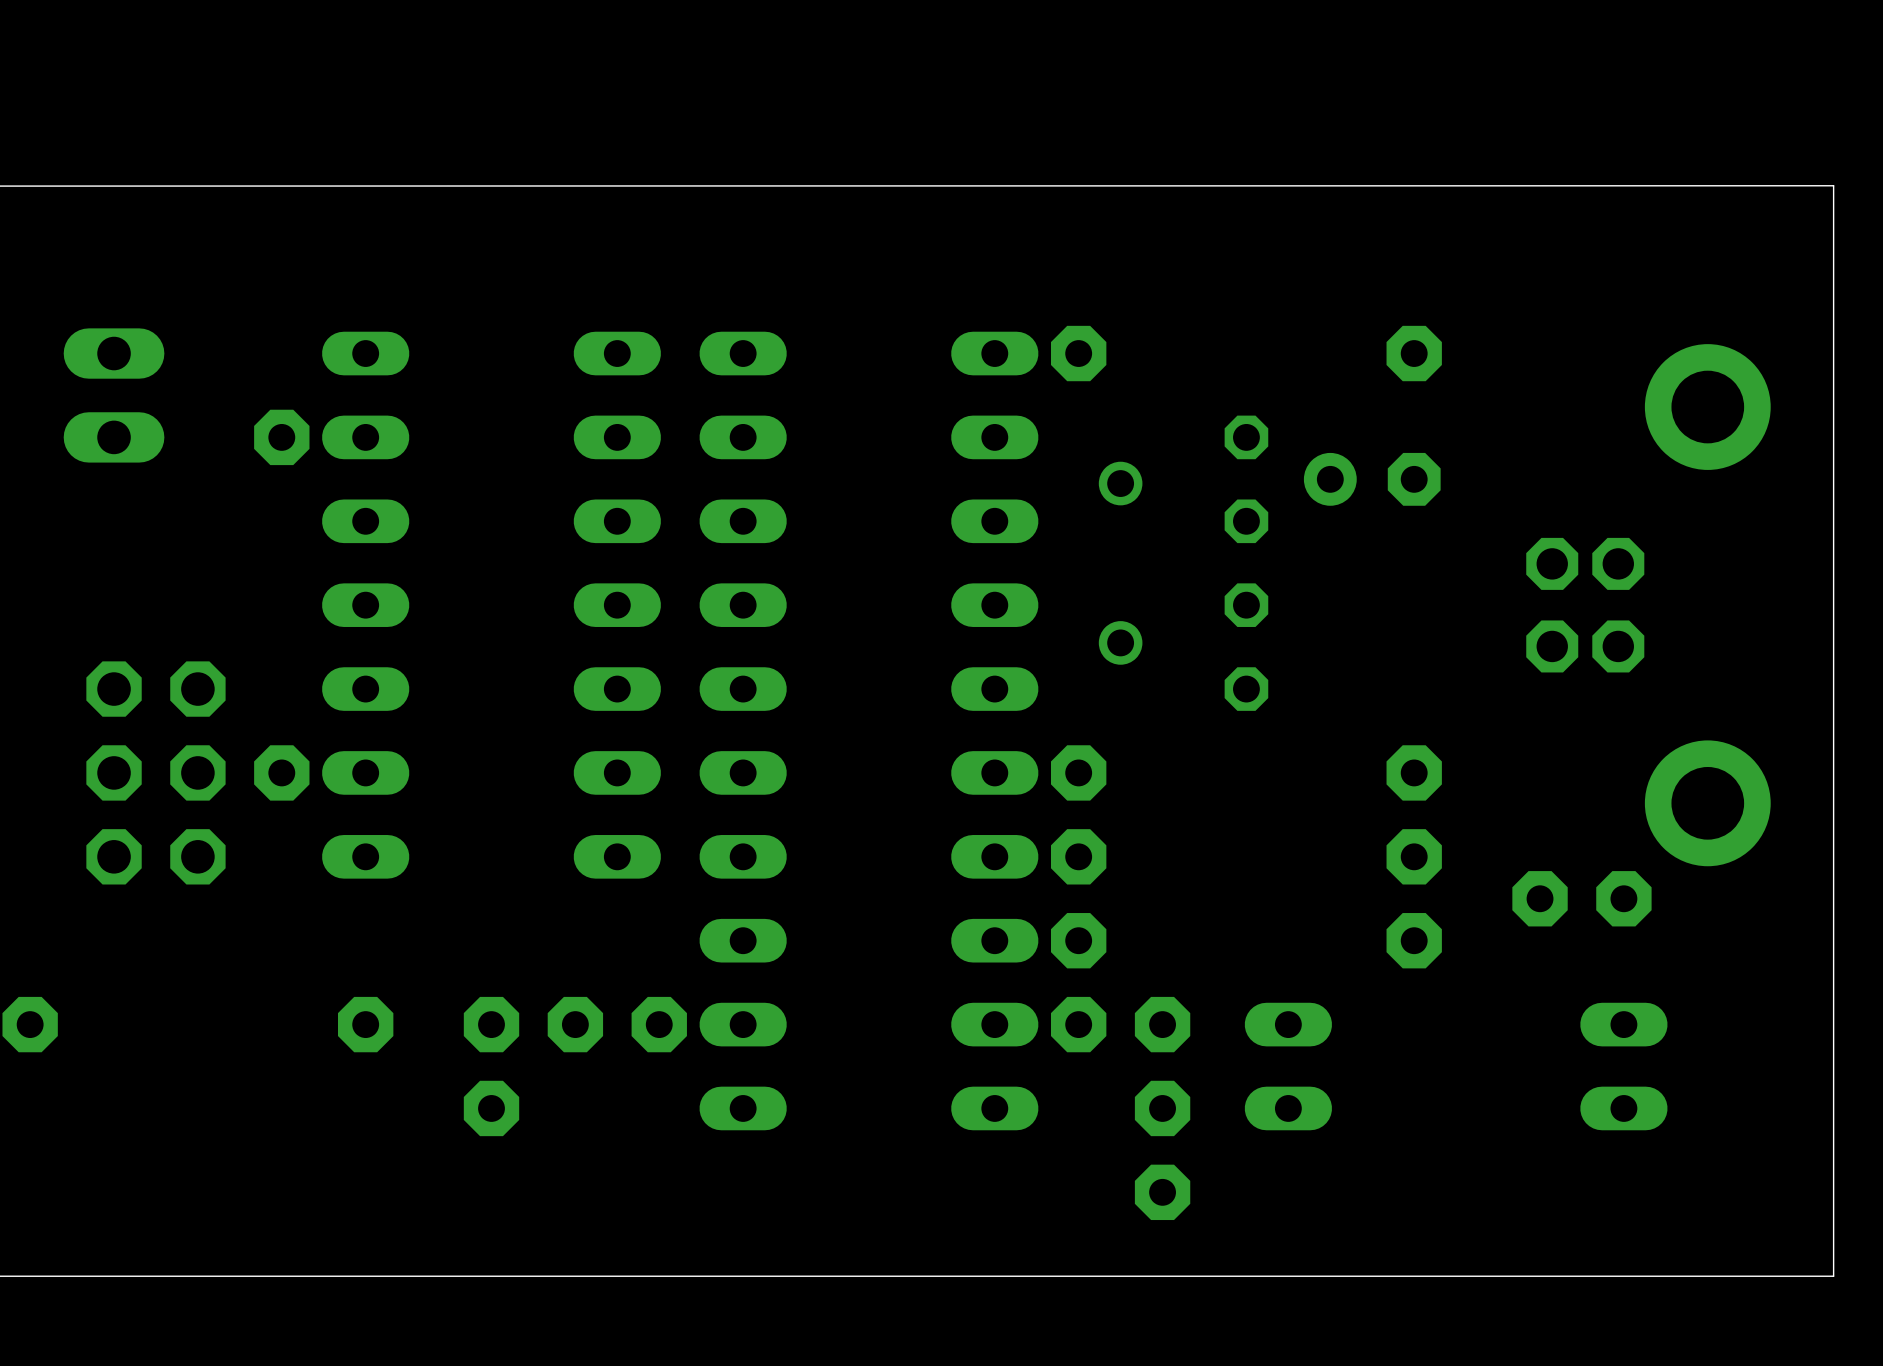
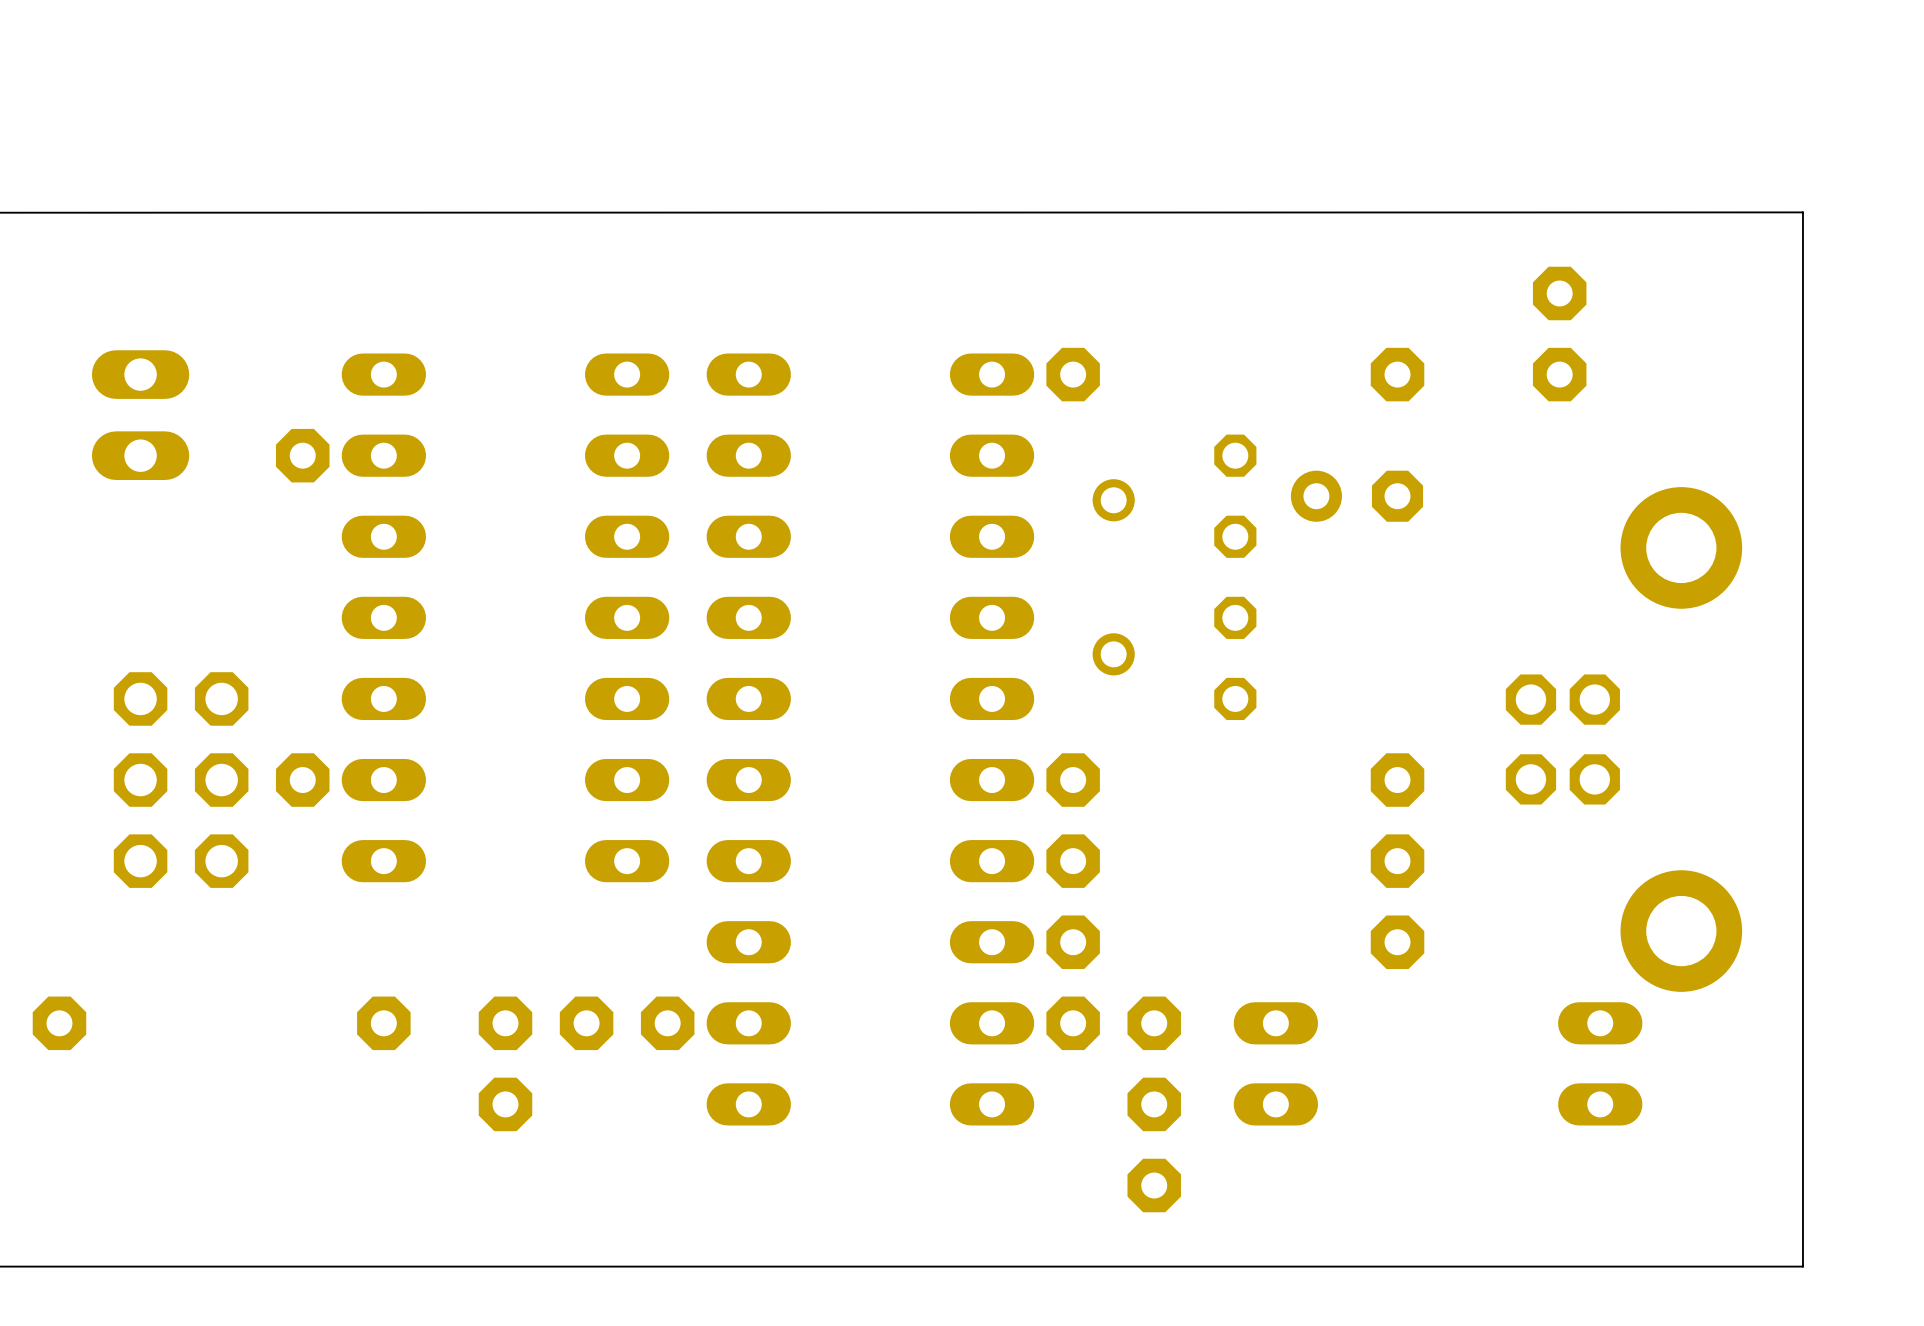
part position: (1648, 605) -> (1623, 739)
part rotation: 0° (1581, 898) -> 90° clockwise (1559, 334)
part position: (1581, 898) -> (1559, 334)

